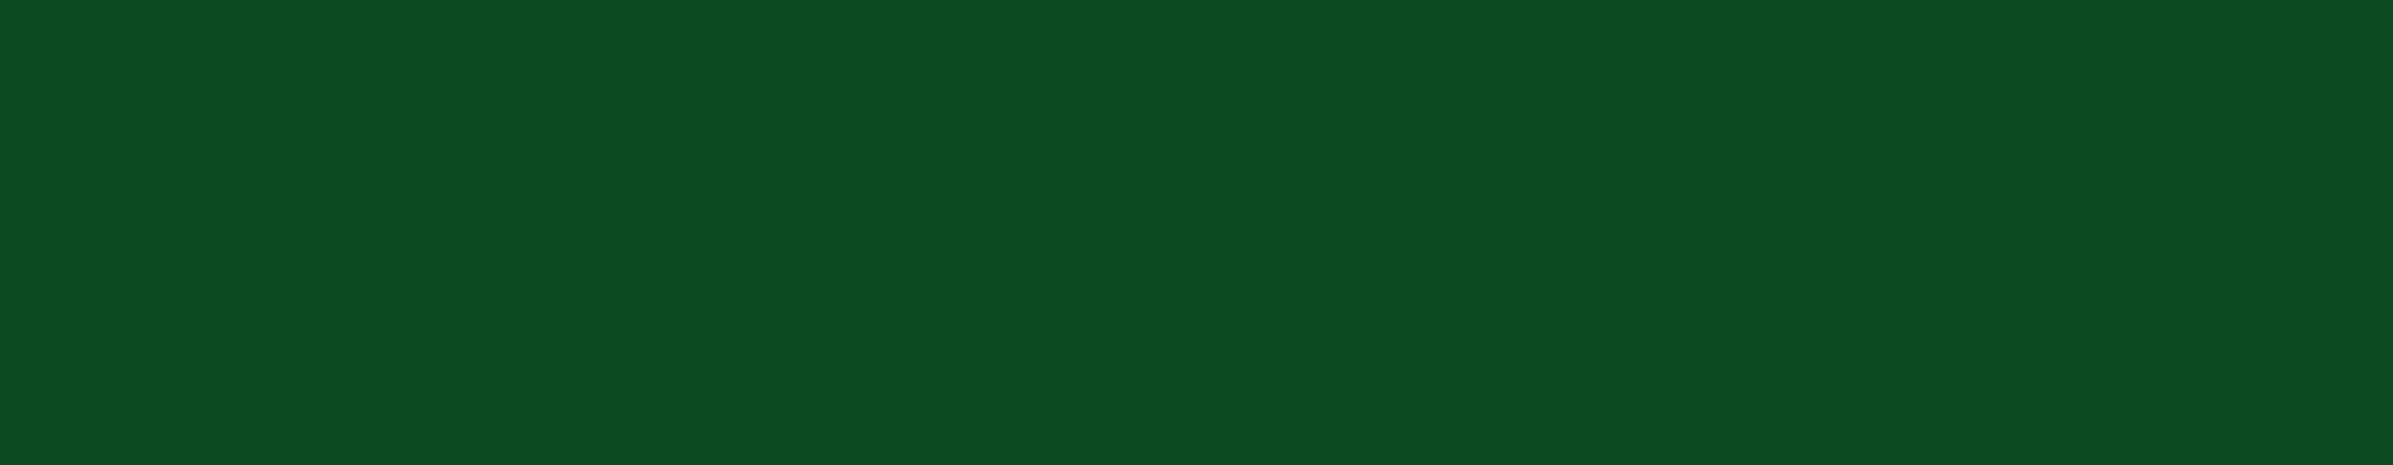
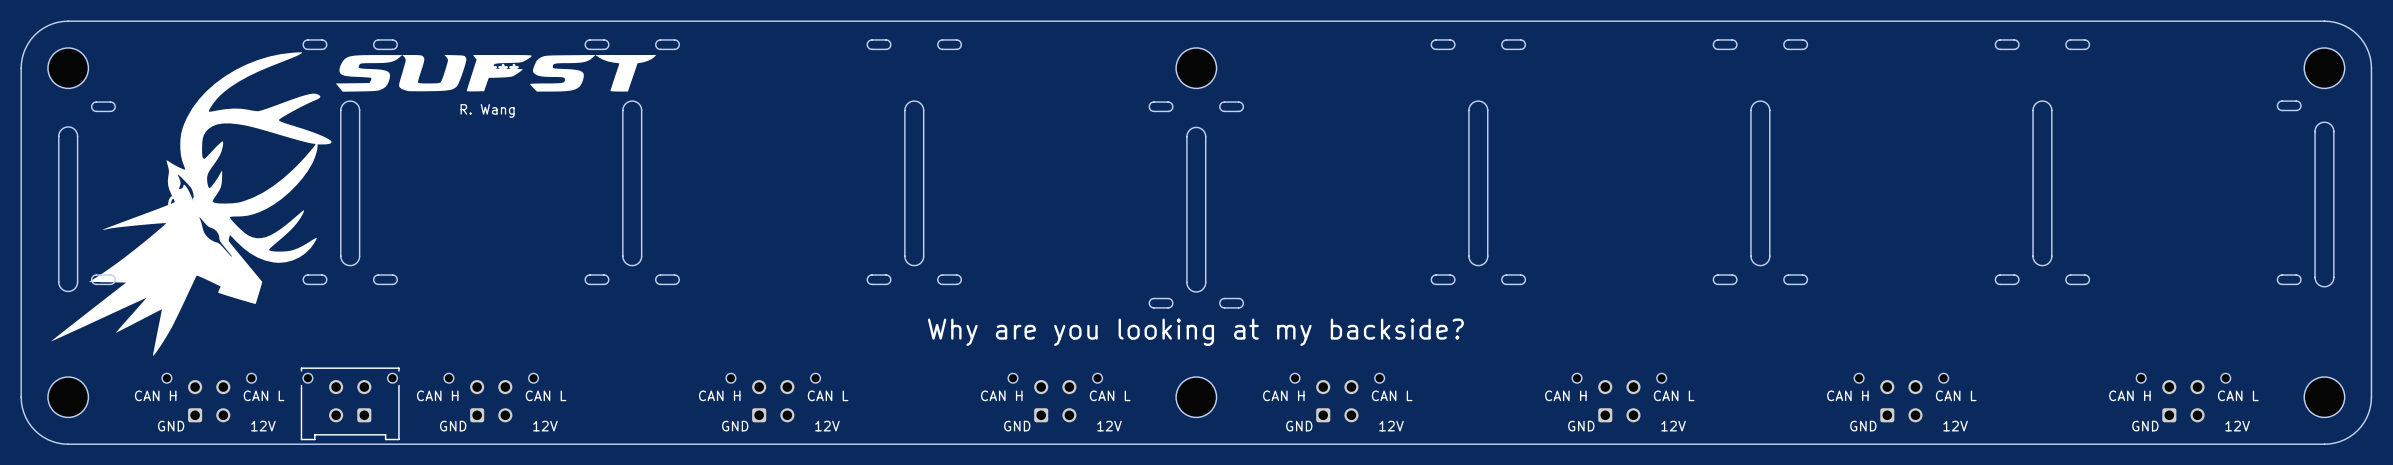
board edge: none -> (2324, 21) (62, 21) (47, 25) (34, 34) (25, 47) (21, 62) (21, 402) (25, 417) (38, 433) (52, 441) (68, 444) (2329, 443) (2344, 439) (2357, 430) (2366, 417) (2371, 402) (2371, 68) (2366, 47) (2357, 34) (2339, 23) (2324, 21)
board edge: none -> (322, 39) (306, 40) (303, 45) (307, 49) (323, 49) (326, 44) (322, 39)
board edge: none -> (392, 39) (377, 40) (373, 45) (377, 49) (393, 49) (397, 44) (392, 39)
board edge: none -> (604, 39) (588, 40) (585, 45) (589, 49) (605, 49) (608, 44) (604, 39)
board edge: none -> (674, 39) (659, 40) (655, 45) (659, 49) (675, 49) (679, 44) (674, 39)
board edge: none -> (886, 39) (870, 40) (867, 45) (871, 49) (887, 49) (890, 44) (886, 39)
board edge: none -> (956, 39) (941, 40) (937, 45) (941, 49) (957, 49) (961, 44) (956, 39)
board edge: none -> (1450, 39) (1434, 40) (1431, 45) (1435, 49) (1451, 49) (1454, 44) (1450, 39)
board edge: none -> (1520, 39) (1505, 40) (1502, 45) (1505, 49) (1521, 49) (1525, 44) (1520, 39)
board edge: none -> (1732, 39) (1716, 40) (1713, 45) (1717, 49) (1733, 49) (1736, 44) (1732, 39)
board edge: none -> (1802, 39) (1787, 40) (1784, 45) (1787, 49) (1803, 49) (1807, 44) (1802, 39)
board edge: none -> (2014, 39) (1998, 40) (1995, 45) (1999, 49) (2015, 49) (2018, 44) (2014, 39)
board edge: none -> (2084, 39) (2069, 40) (2066, 45) (2070, 49) (2085, 49) (2089, 44) (2084, 39)
part: none -> (68, 68)
part: none -> (1196, 68)
part: none -> (2324, 68)
part: none -> (496, 73)
board edge: none -> (2296, 101) (2280, 101) (2277, 107) (2281, 110) (2297, 110) (2300, 105) (2296, 101)
board edge: none -> (110, 102) (95, 102) (91, 107) (95, 111) (111, 111) (115, 106) (110, 102)
board edge: none -> (1168, 102) (1152, 102) (1149, 108) (1153, 111) (1169, 111) (1172, 105) (1168, 102)
board edge: none -> (1238, 102) (1222, 102) (1220, 108) (1223, 111) (1240, 111) (1243, 105) (1238, 102)
board edge: none -> (359, 110) (359, 256) (356, 262) (350, 265) (343, 262) (340, 256) (340, 110) (343, 103) (350, 101) (356, 103) (359, 110)
text: none -> R. Wang (487, 110)
board edge: none -> (641, 110) (641, 256) (638, 262) (632, 265) (625, 262) (622, 256) (622, 110) (625, 103) (632, 101) (638, 103) (641, 110)
board edge: none -> (923, 110) (923, 256) (920, 262) (914, 265) (907, 262) (904, 256) (904, 110) (907, 103) (914, 101) (920, 103) (923, 110)
board edge: none -> (1487, 110) (1487, 256) (1484, 262) (1478, 265) (1471, 262) (1468, 256) (1468, 110) (1471, 103) (1478, 101) (1484, 103) (1487, 110)
board edge: none -> (1769, 110) (1769, 256) (1767, 262) (1760, 265) (1753, 262) (1750, 256) (1750, 110) (1753, 103) (1760, 101) (1767, 103) (1769, 110)
board edge: none -> (2051, 110) (2051, 256) (2049, 262) (2042, 265) (2035, 262) (2033, 256) (2033, 110) (2035, 103) (2042, 101) (2049, 103) (2051, 110)
board edge: none -> (2333, 131) (2333, 277) (2331, 284) (2324, 286) (2317, 284) (2315, 277) (2315, 131) (2317, 124) (2324, 122) (2331, 124) (2333, 131)
board edge: none -> (77, 136) (77, 282) (74, 288) (68, 291) (61, 288) (58, 282) (58, 136) (61, 129) (68, 126) (74, 129) (77, 136)
board edge: none -> (1205, 136) (1205, 282) (1202, 289) (1196, 291) (1189, 289) (1186, 282) (1186, 136) (1189, 130) (1196, 127) (1202, 130) (1205, 136)
part: none -> (191, 204)
board edge: none -> (110, 275) (95, 275) (91, 280) (95, 284) (111, 284) (115, 279) (110, 275)
board edge: none -> (322, 275) (306, 275) (303, 280) (307, 284) (323, 284) (326, 279) (322, 275)
board edge: none -> (392, 275) (377, 275) (373, 280) (377, 284) (393, 284) (397, 279) (392, 275)
board edge: none -> (604, 275) (588, 275) (585, 280) (589, 284) (605, 284) (608, 279) (604, 275)
board edge: none -> (674, 275) (659, 275) (655, 280) (659, 284) (675, 284) (679, 279) (674, 275)
board edge: none -> (886, 275) (870, 275) (867, 280) (871, 284) (887, 284) (890, 279) (886, 275)
board edge: none -> (956, 275) (941, 275) (937, 280) (941, 284) (957, 284) (961, 279) (956, 275)
board edge: none -> (1450, 275) (1434, 275) (1431, 280) (1435, 284) (1451, 284) (1454, 279) (1450, 275)
board edge: none -> (1520, 275) (1505, 275) (1502, 280) (1505, 284) (1521, 284) (1525, 279) (1520, 275)
board edge: none -> (1732, 275) (1716, 275) (1713, 280) (1717, 284) (1733, 284) (1736, 279) (1732, 275)
board edge: none -> (1802, 275) (1787, 275) (1784, 280) (1787, 284) (1803, 284) (1807, 279) (1802, 275)
board edge: none -> (2014, 275) (1998, 275) (1995, 280) (1999, 284) (2015, 284) (2018, 279) (2014, 275)
board edge: none -> (2084, 275) (2069, 275) (2066, 280) (2070, 284) (2085, 284) (2089, 279) (2084, 275)
board edge: none -> (2296, 275) (2280, 275) (2277, 280) (2281, 284) (2297, 284) (2300, 279) (2296, 275)
board edge: none -> (1168, 298) (1152, 298) (1149, 304) (1153, 307) (1169, 307) (1172, 302) (1168, 298)
board edge: none -> (1238, 298) (1223, 298) (1219, 304) (1223, 307) (1239, 307) (1243, 302) (1238, 298)
text: none -> Why are you looking at my backside? (1195, 332)
text: none -> CAN H CAN L (209, 395)
text: none -> CAN H CAN L (491, 395)
text: none -> CAN H CAN L (773, 395)
text: none -> CAN H CAN L (1055, 395)
text: none -> CAN H CAN L (1337, 395)
text: none -> CAN H CAN L (1619, 395)
text: none -> CAN H CAN L (1901, 395)
text: none -> CAN H CAN L (2183, 395)
part: none -> (68, 397)
part: none -> (209, 397)
part: none -> (491, 397)
part: none -> (773, 397)
part: none -> (1055, 397)
part: none -> (1196, 397)
part: none -> (1337, 397)
part: none -> (1619, 397)
part: none -> (1901, 397)
part: none -> (2183, 397)
part: none -> (2324, 397)
part: none -> (350, 403)
text: none -> GND 12V (216, 426)
text: none -> GND 12V (498, 426)
text: none -> GND 12V (780, 426)
text: none -> GND 12V (1062, 426)
text: none -> GND 12V (1344, 426)
text: none -> GND 12V (1626, 426)
text: none -> GND 12V (1909, 426)
text: none -> GND 12V (2191, 426)

